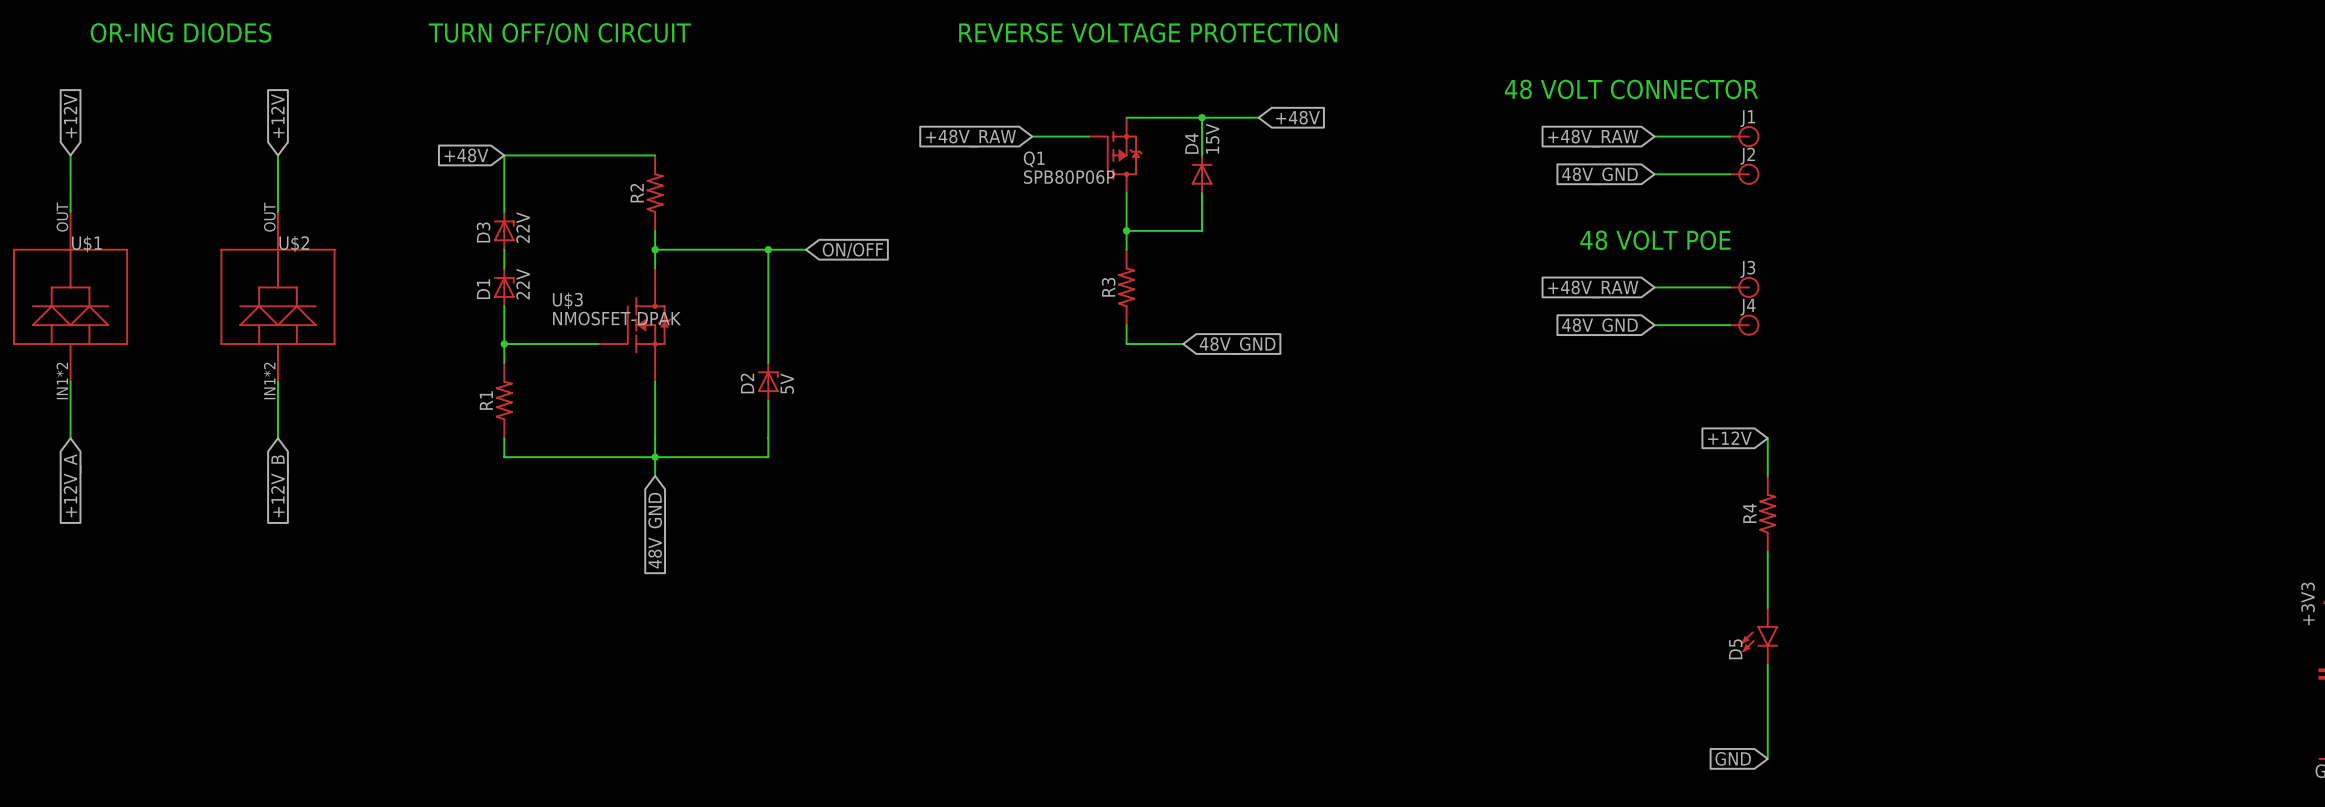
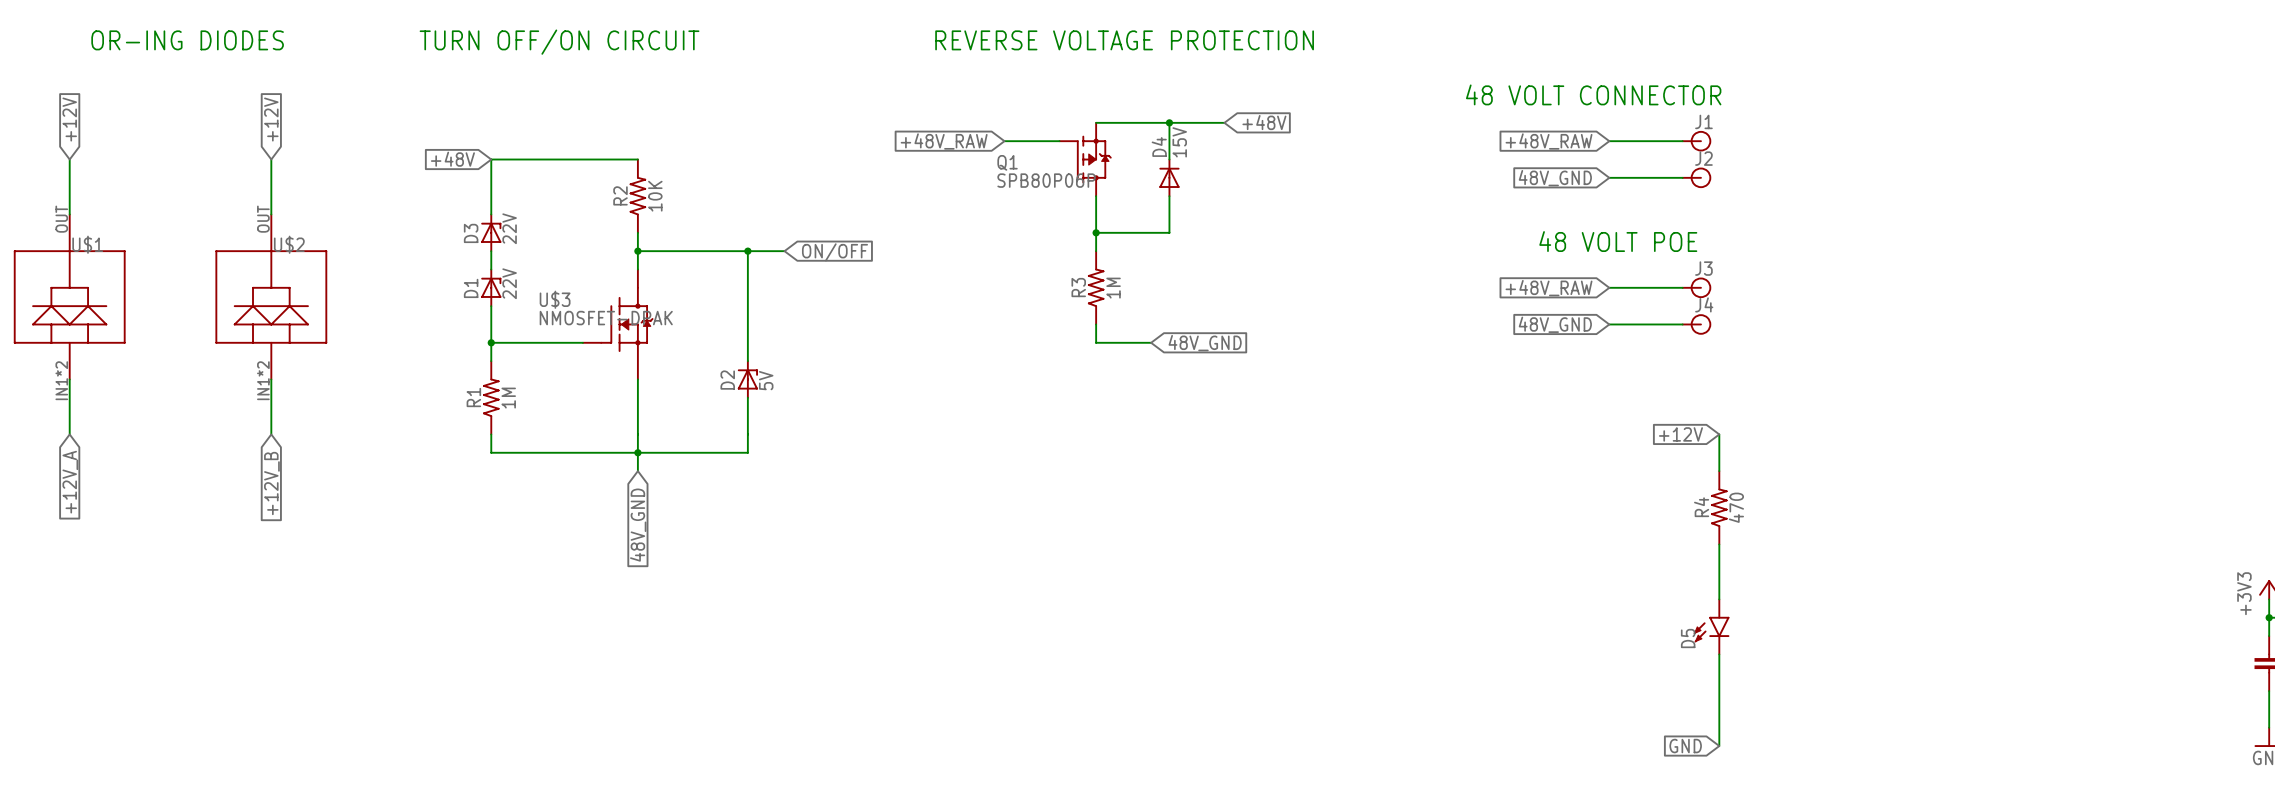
R2 value: none -> 10K (655, 196)
R3 value: none -> 1M (1113, 288)
R1 value: none -> 1M (508, 398)
R4 value: none -> 470 (1736, 507)

